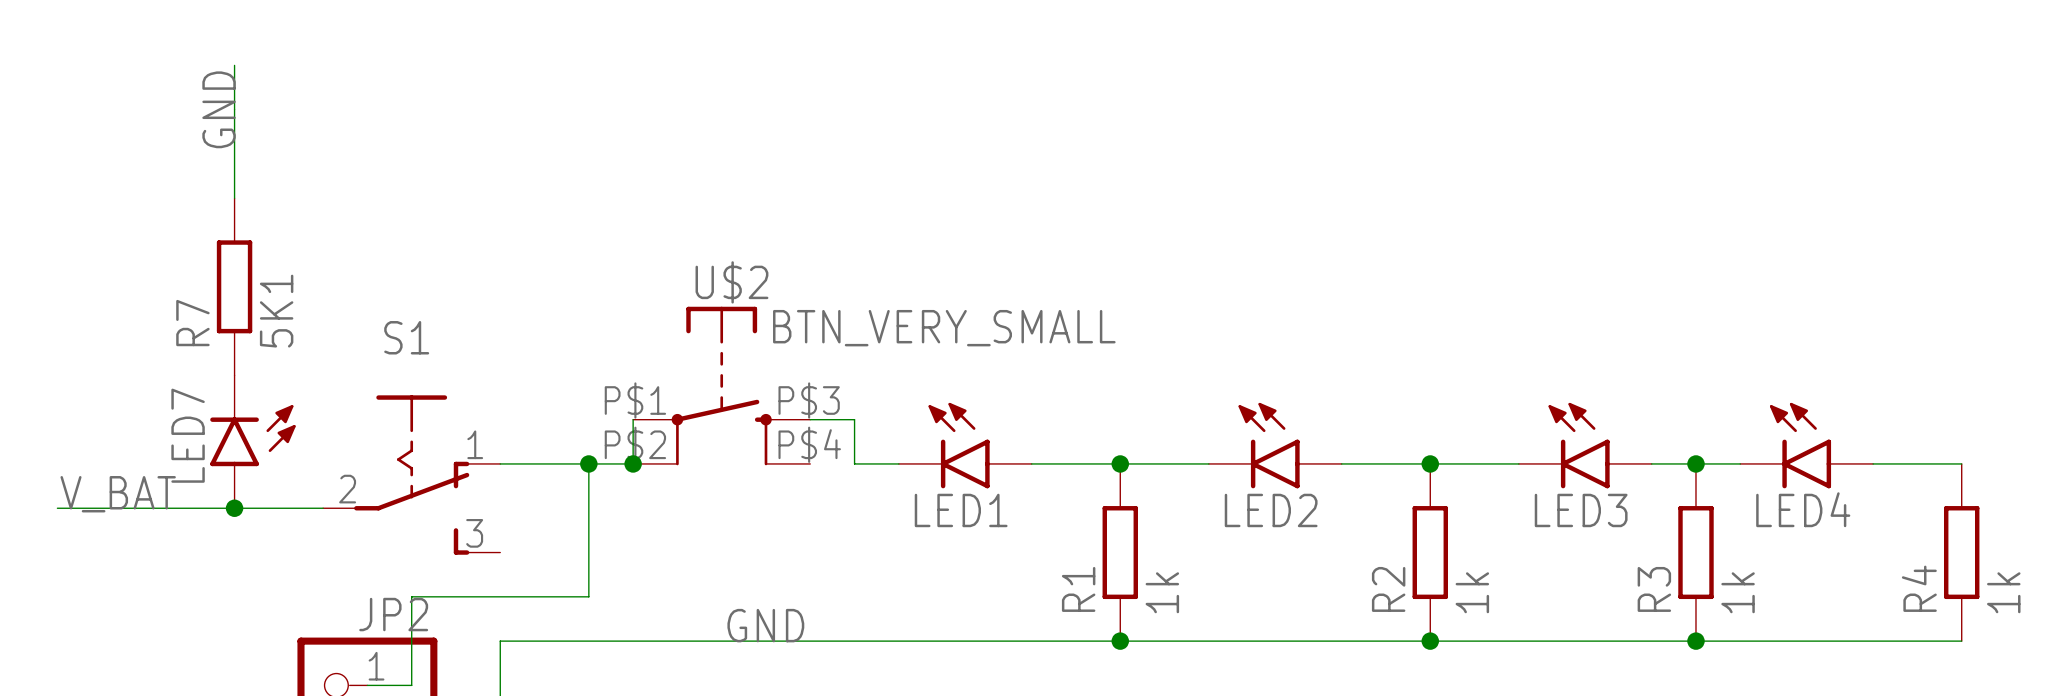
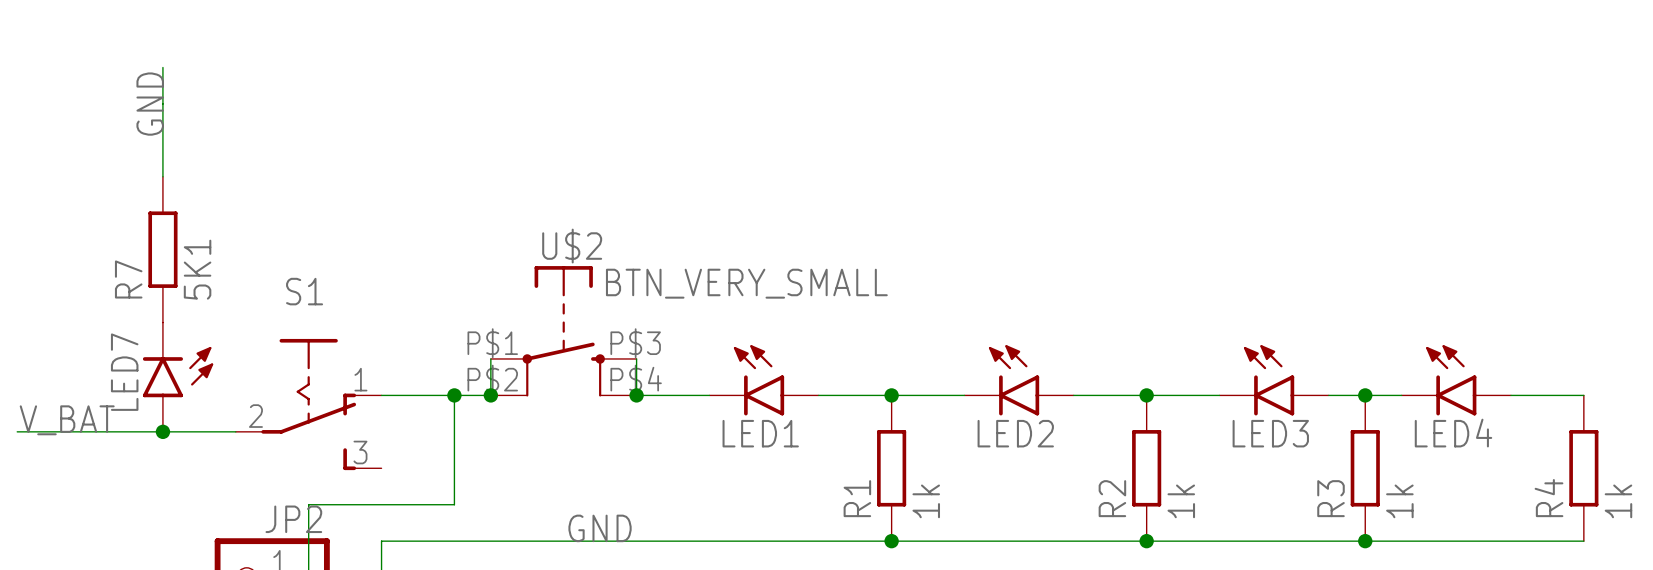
wire: (810, 419) (854, 419) (854, 463) -> (636, 358) (636, 395) (673, 395)
junction: none -> (636, 395)

